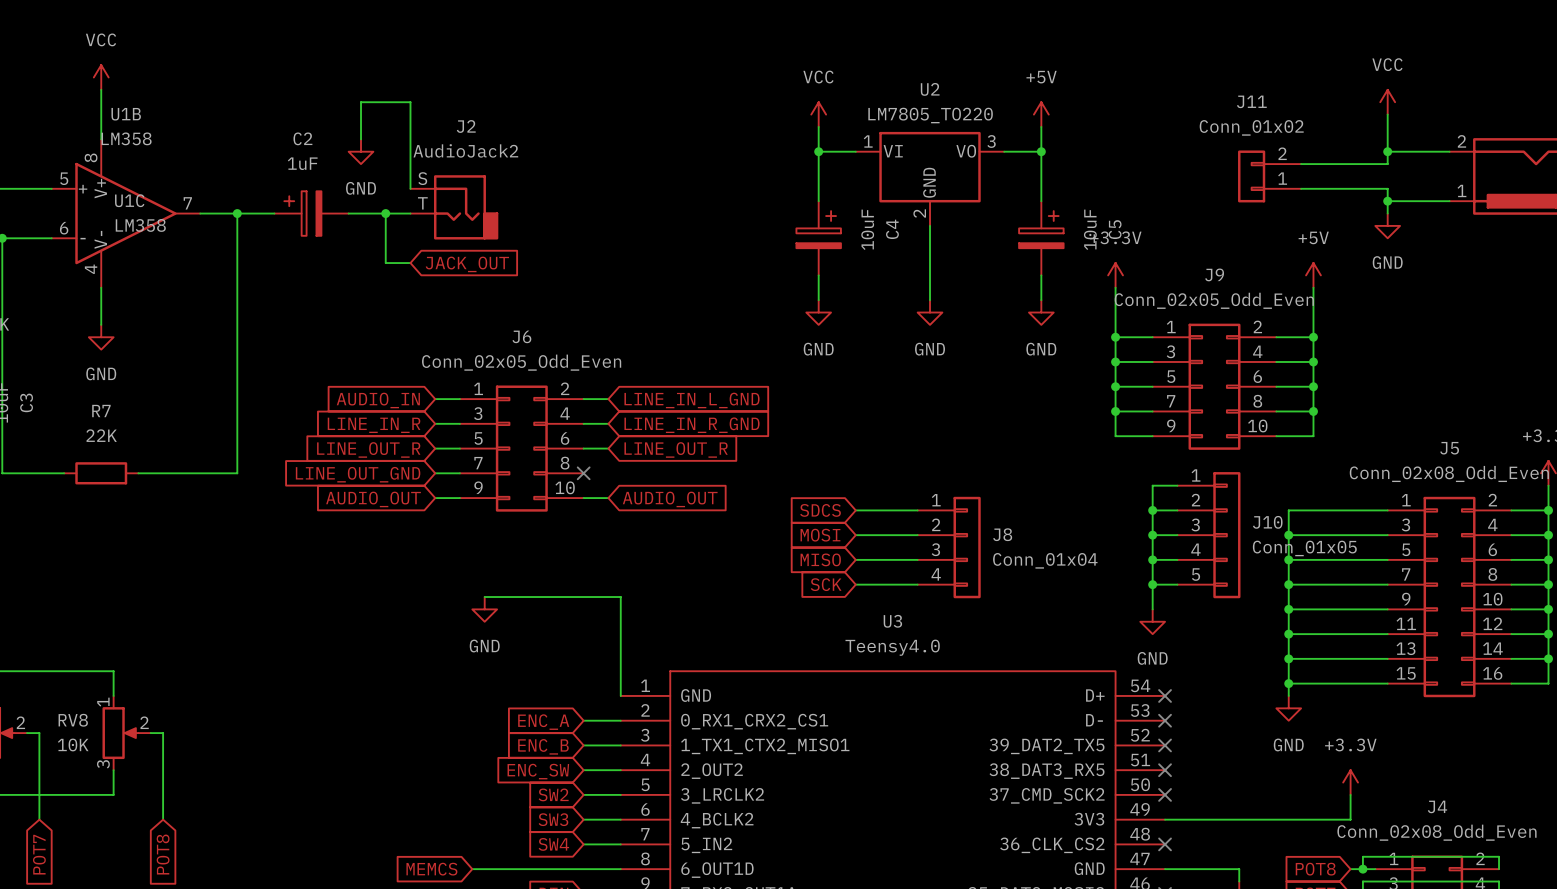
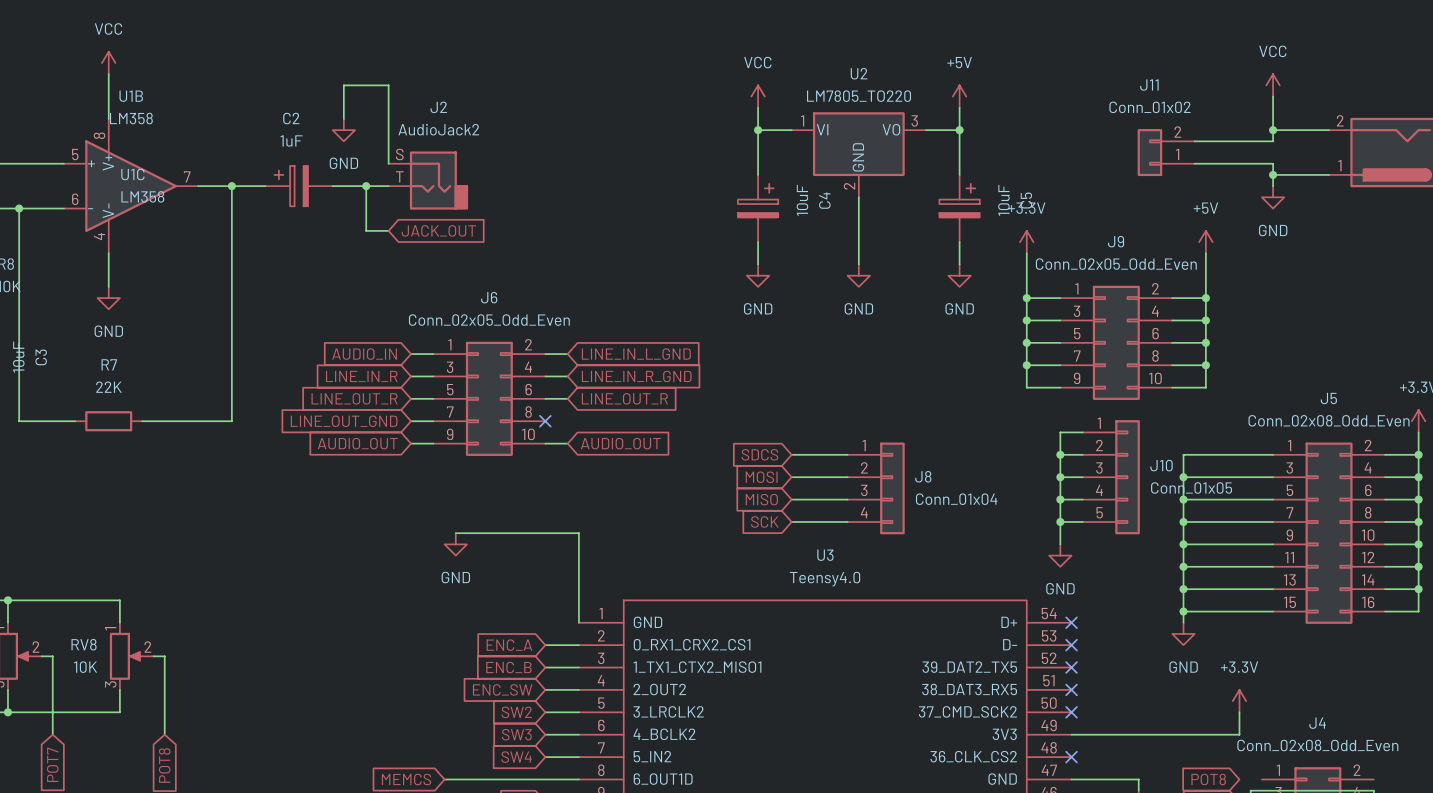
wire: (1350, 869) (1375, 869) -> none
wire: (1362, 869) (1362, 856) (1499, 856) (1499, 869) -> none
junction: (1362, 869) -> none

